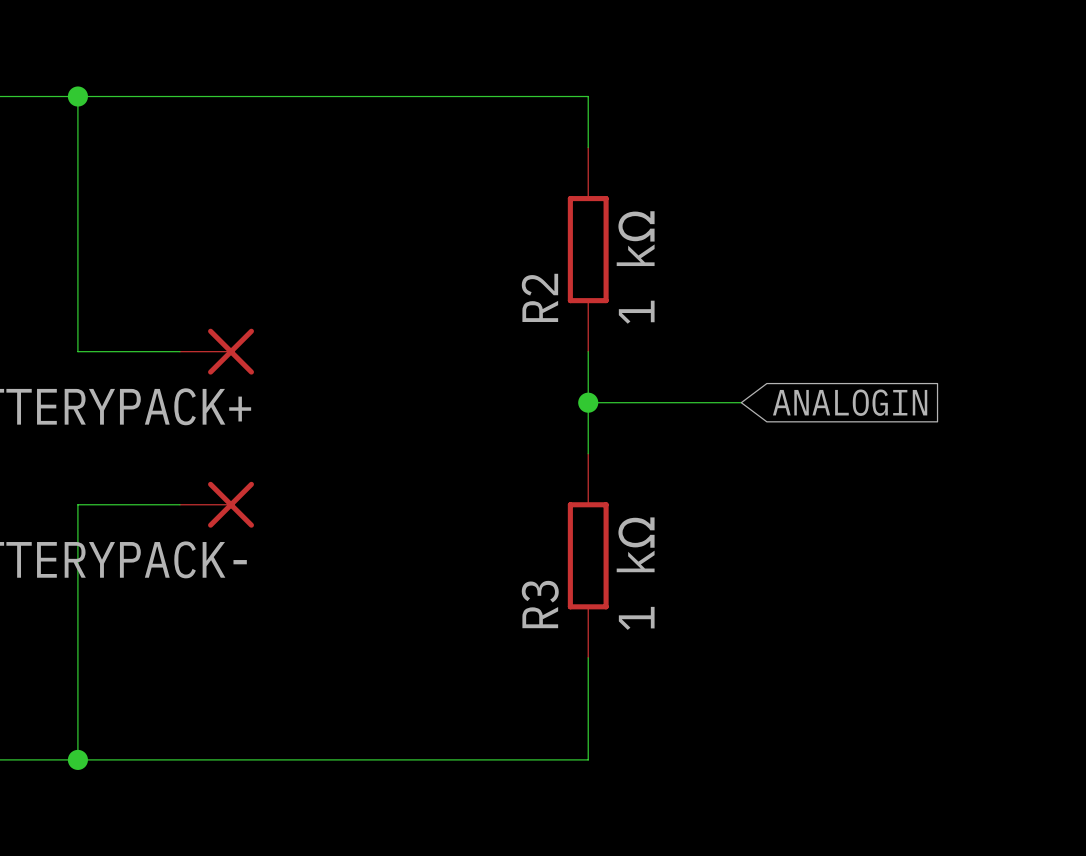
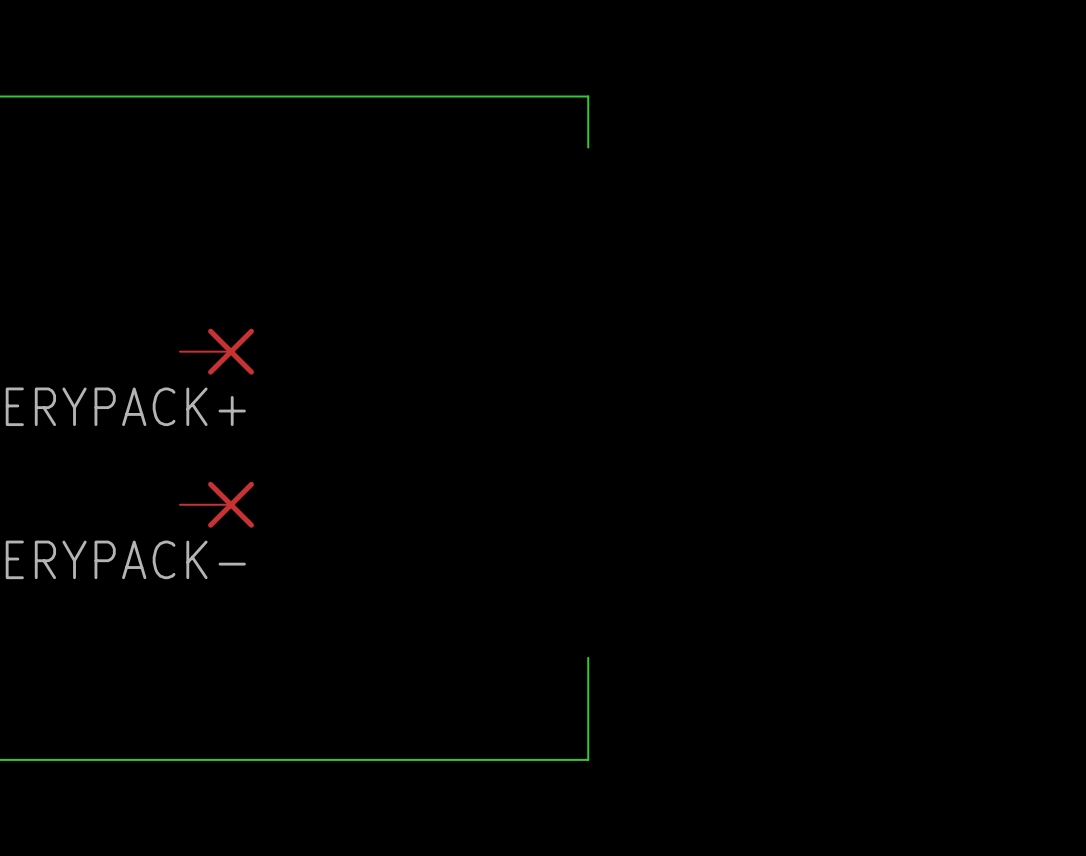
wire: (77, 96) (77, 351) (179, 351) -> none
junction: (77, 96) -> none
R2: 1 kΩ (588, 249) -> none
wire: (588, 351) (588, 453) -> none
wire: (588, 402) (741, 402) -> none
junction: (588, 402) -> none
global label: ANALOGIN (850, 402) -> none
wire: (179, 504) (77, 504) (77, 759) -> none
R3: 1 kΩ (588, 555) -> none
junction: (77, 759) -> none

